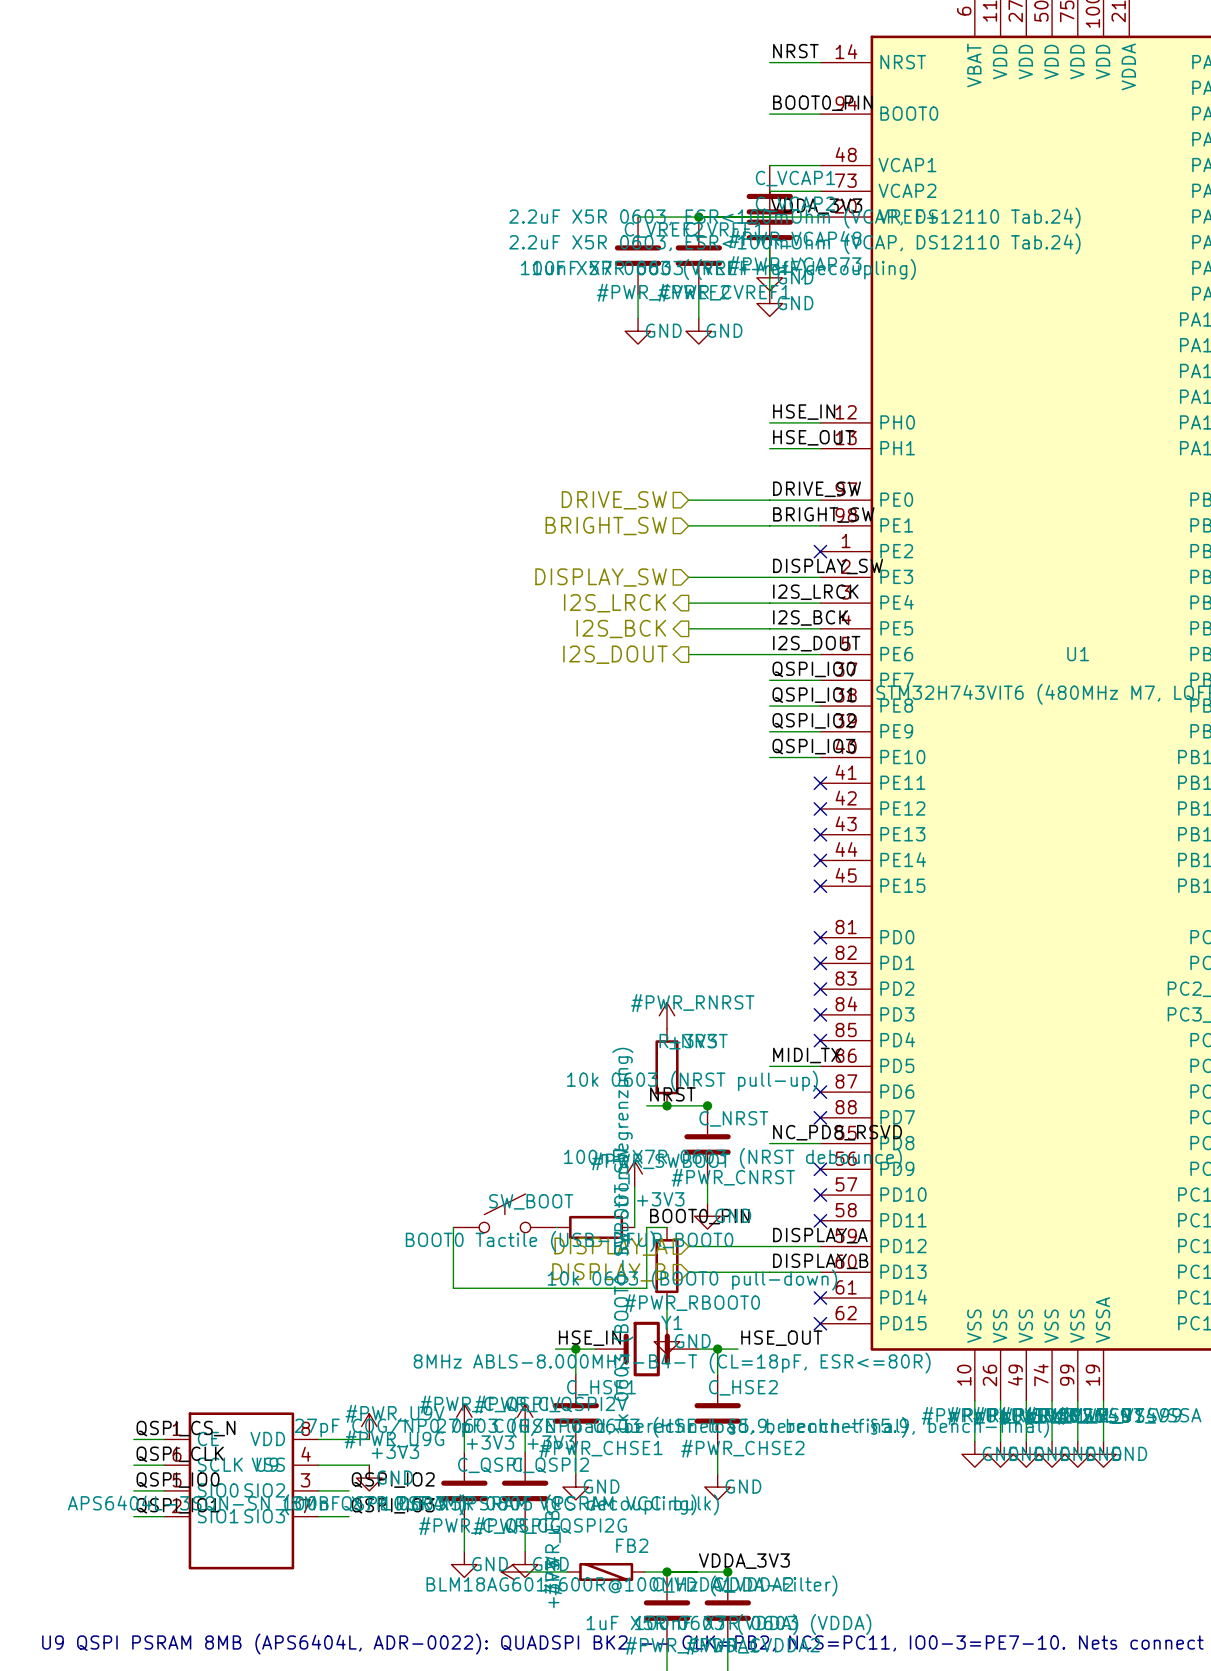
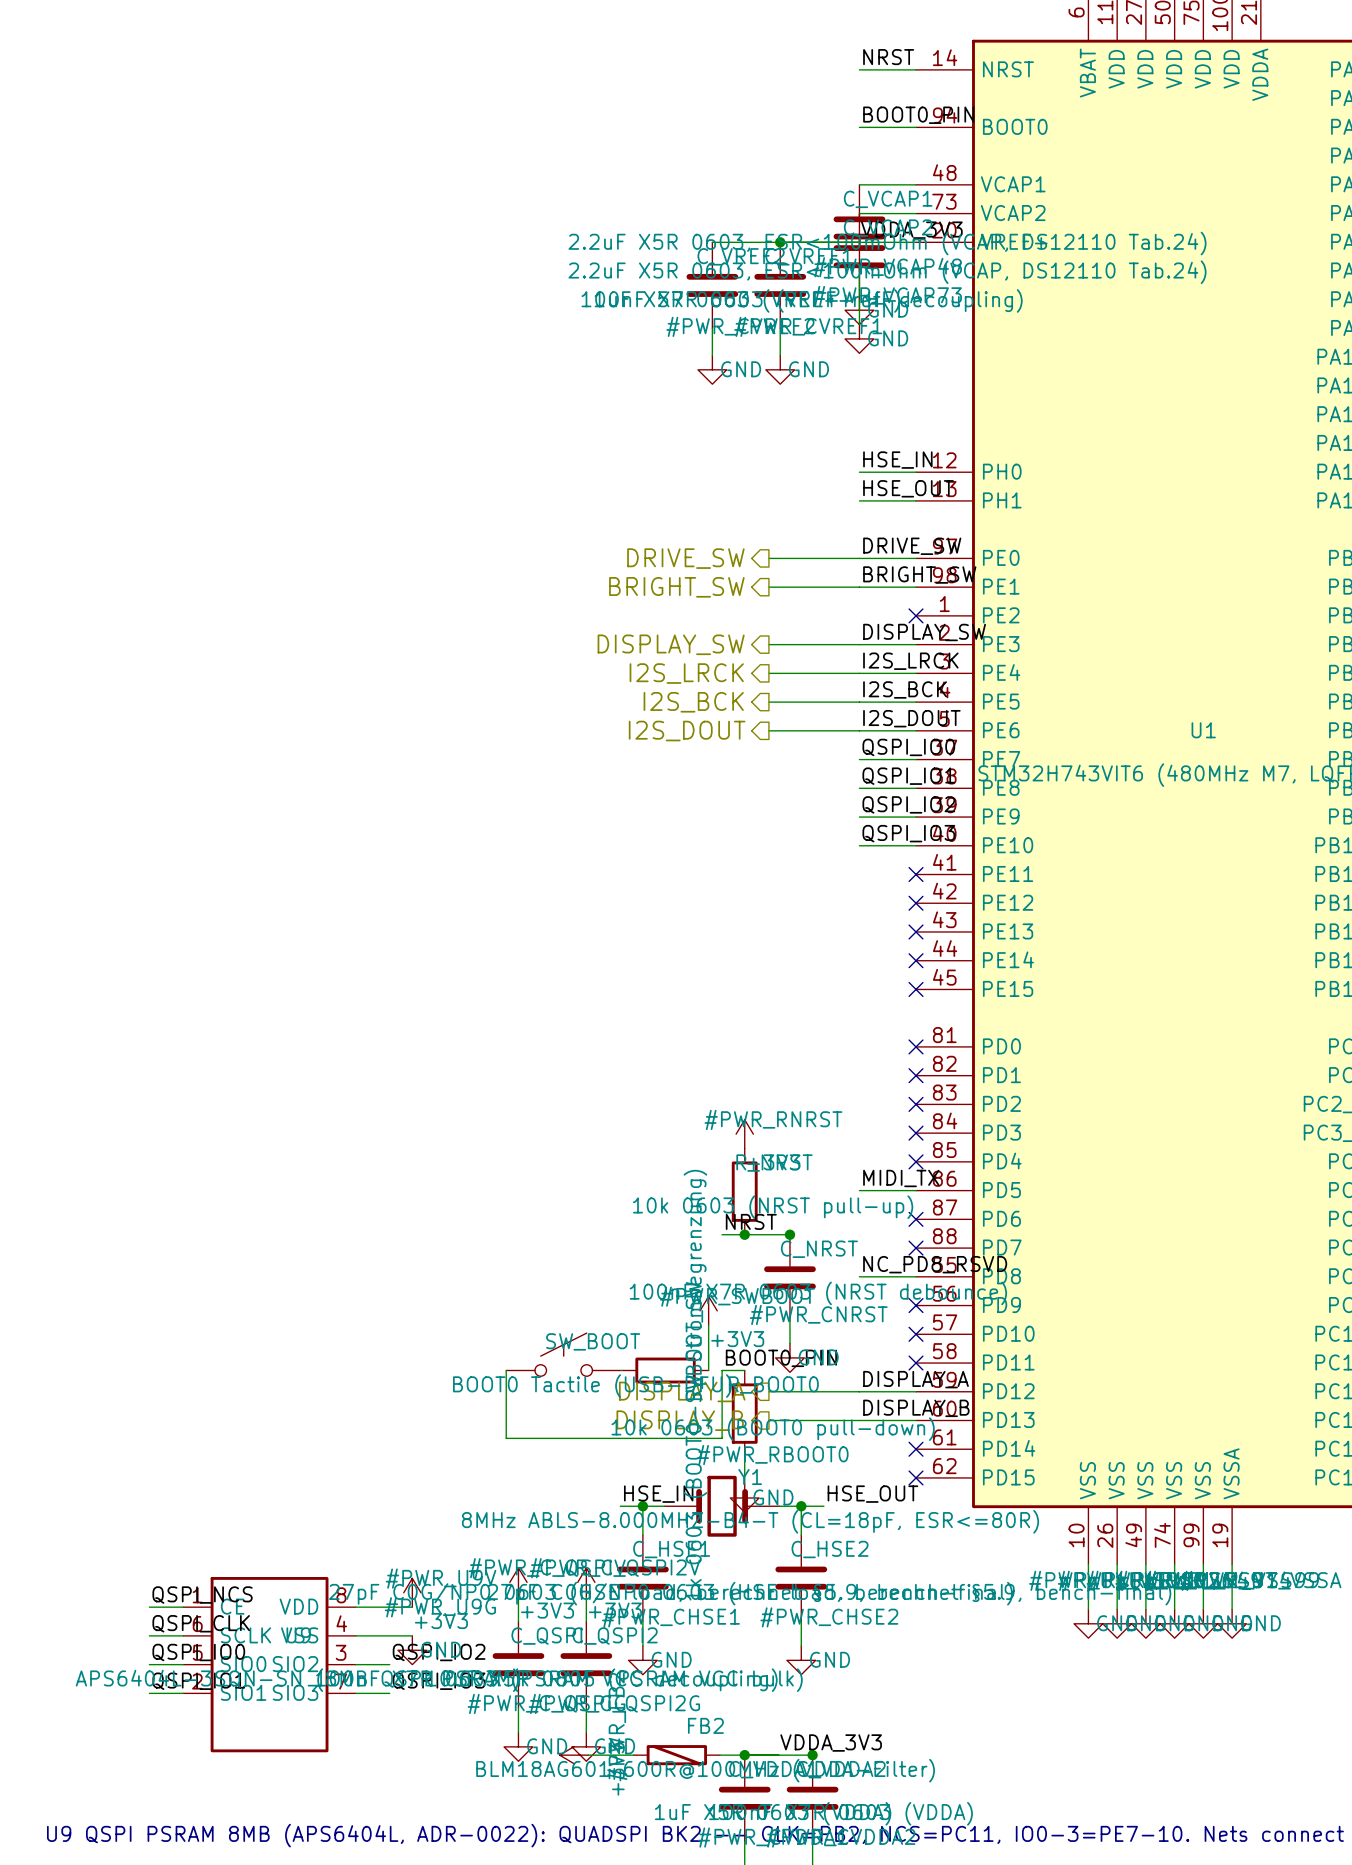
hierarchical label shape: input (614, 500) -> output (685, 558)
hierarchical label shape: input (606, 526) -> output (676, 587)
hierarchical label shape: input (601, 577) -> output (671, 644)
hierarchical label shape: input (611, 1246) -> output (682, 1391)
hierarchical label shape: input (609, 1272) -> output (680, 1420)
label: QSPI_CS_N (186, 1428) -> QSPI_NCS (202, 1595)

